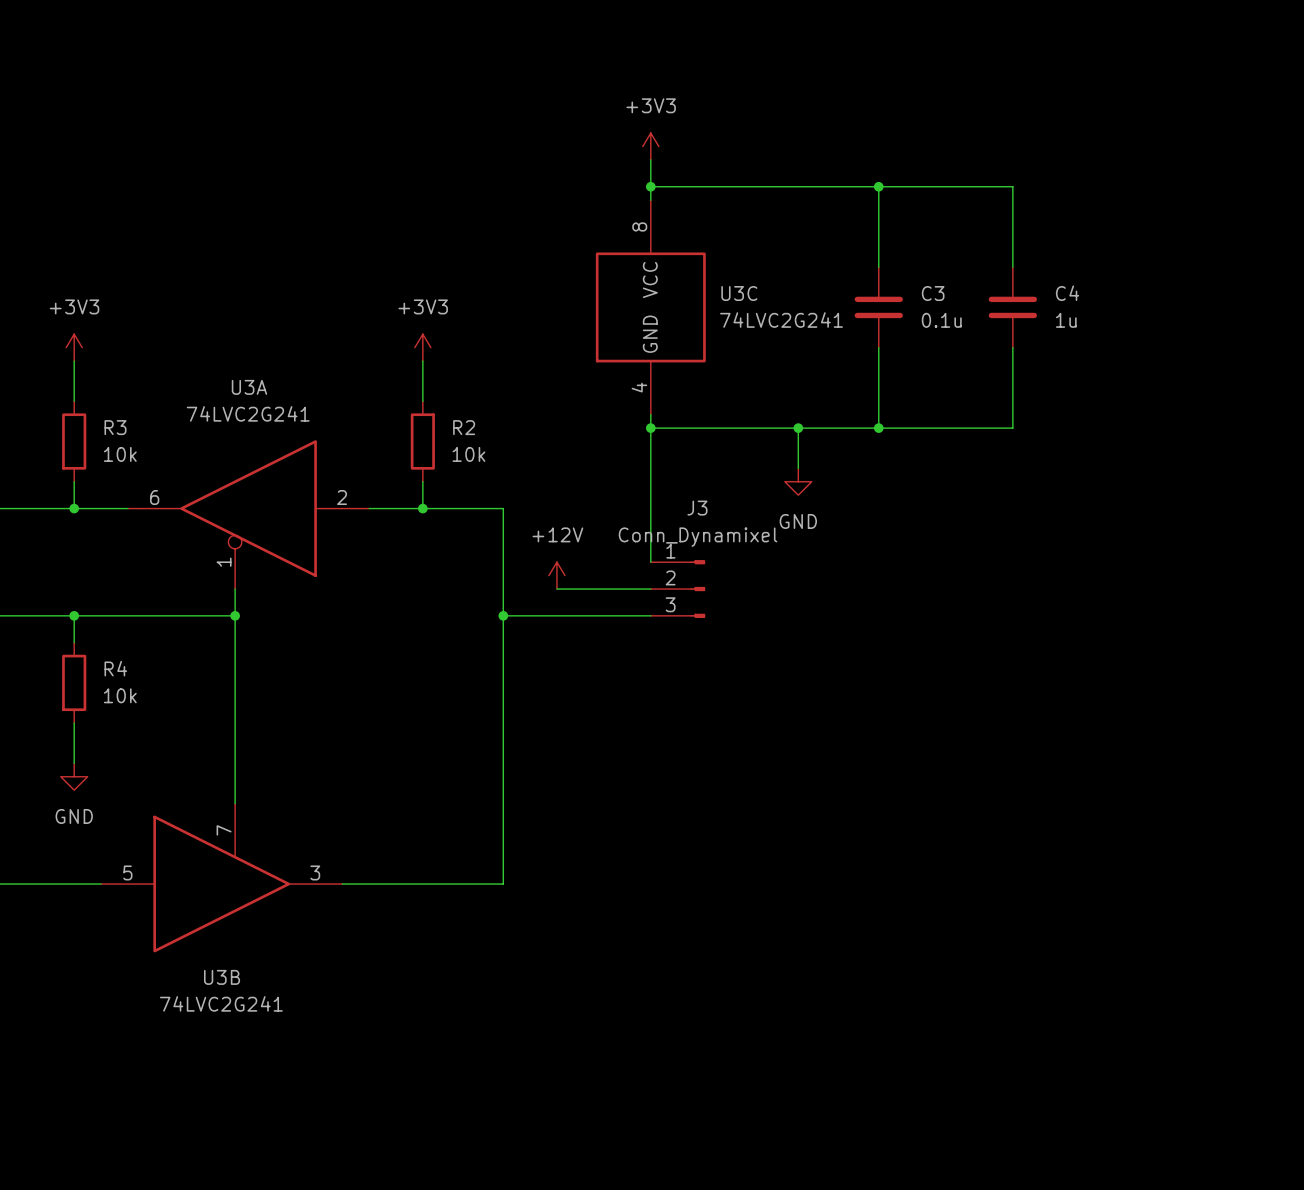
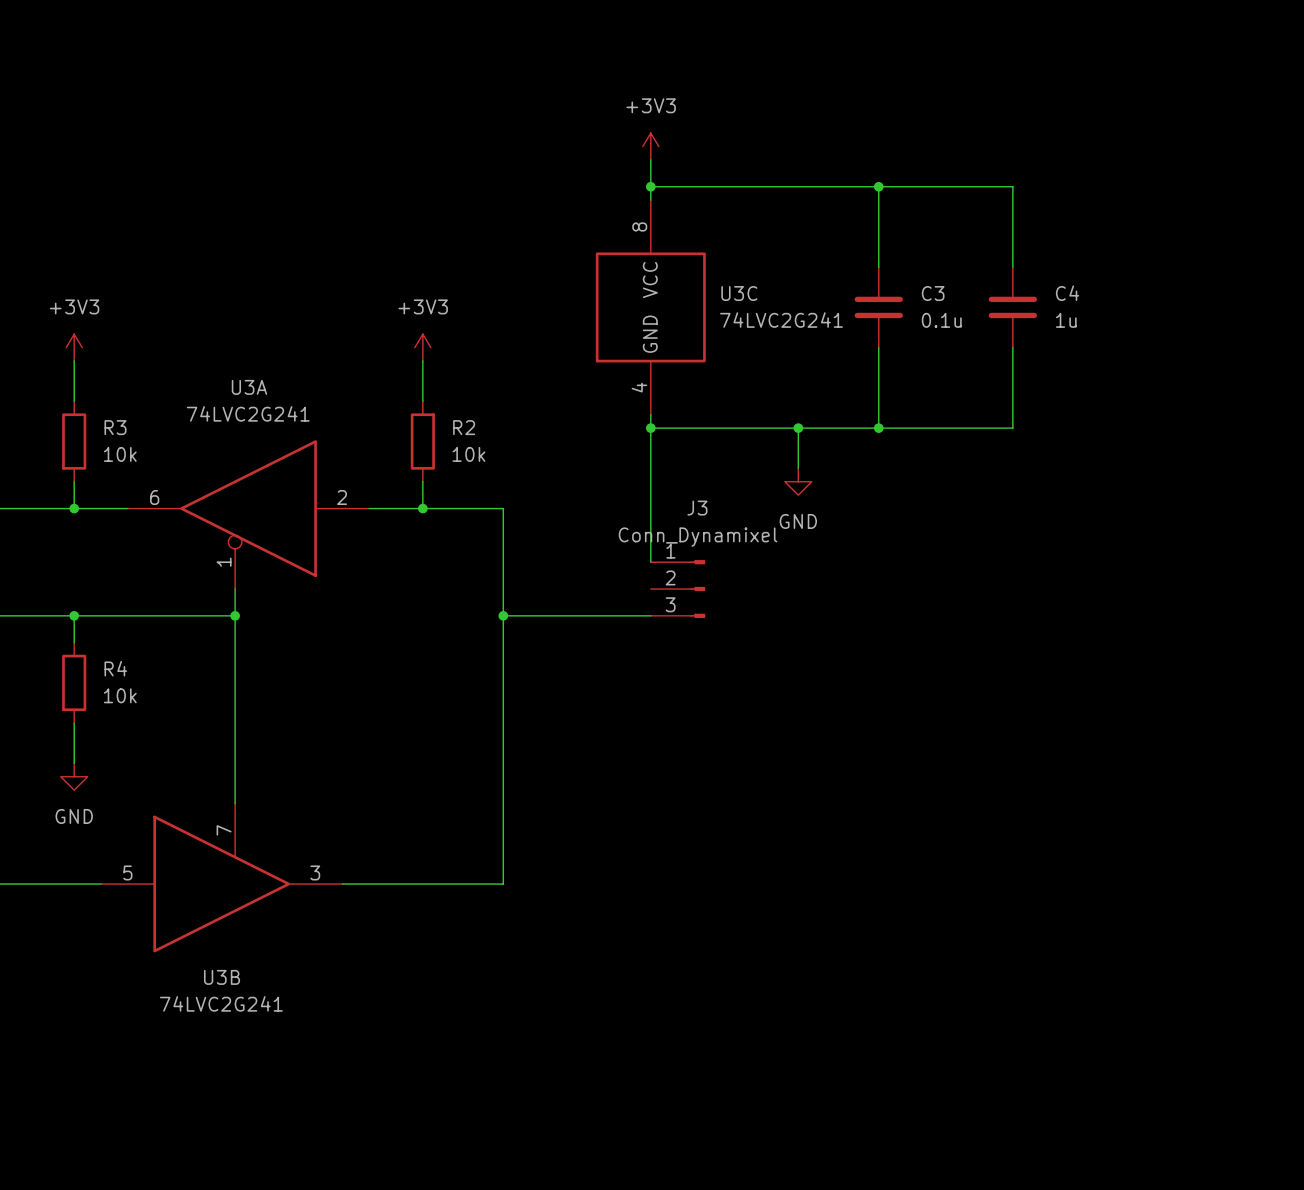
power symbol: +12V (556, 575) -> none
wire: (556, 589) (650, 589) -> none

